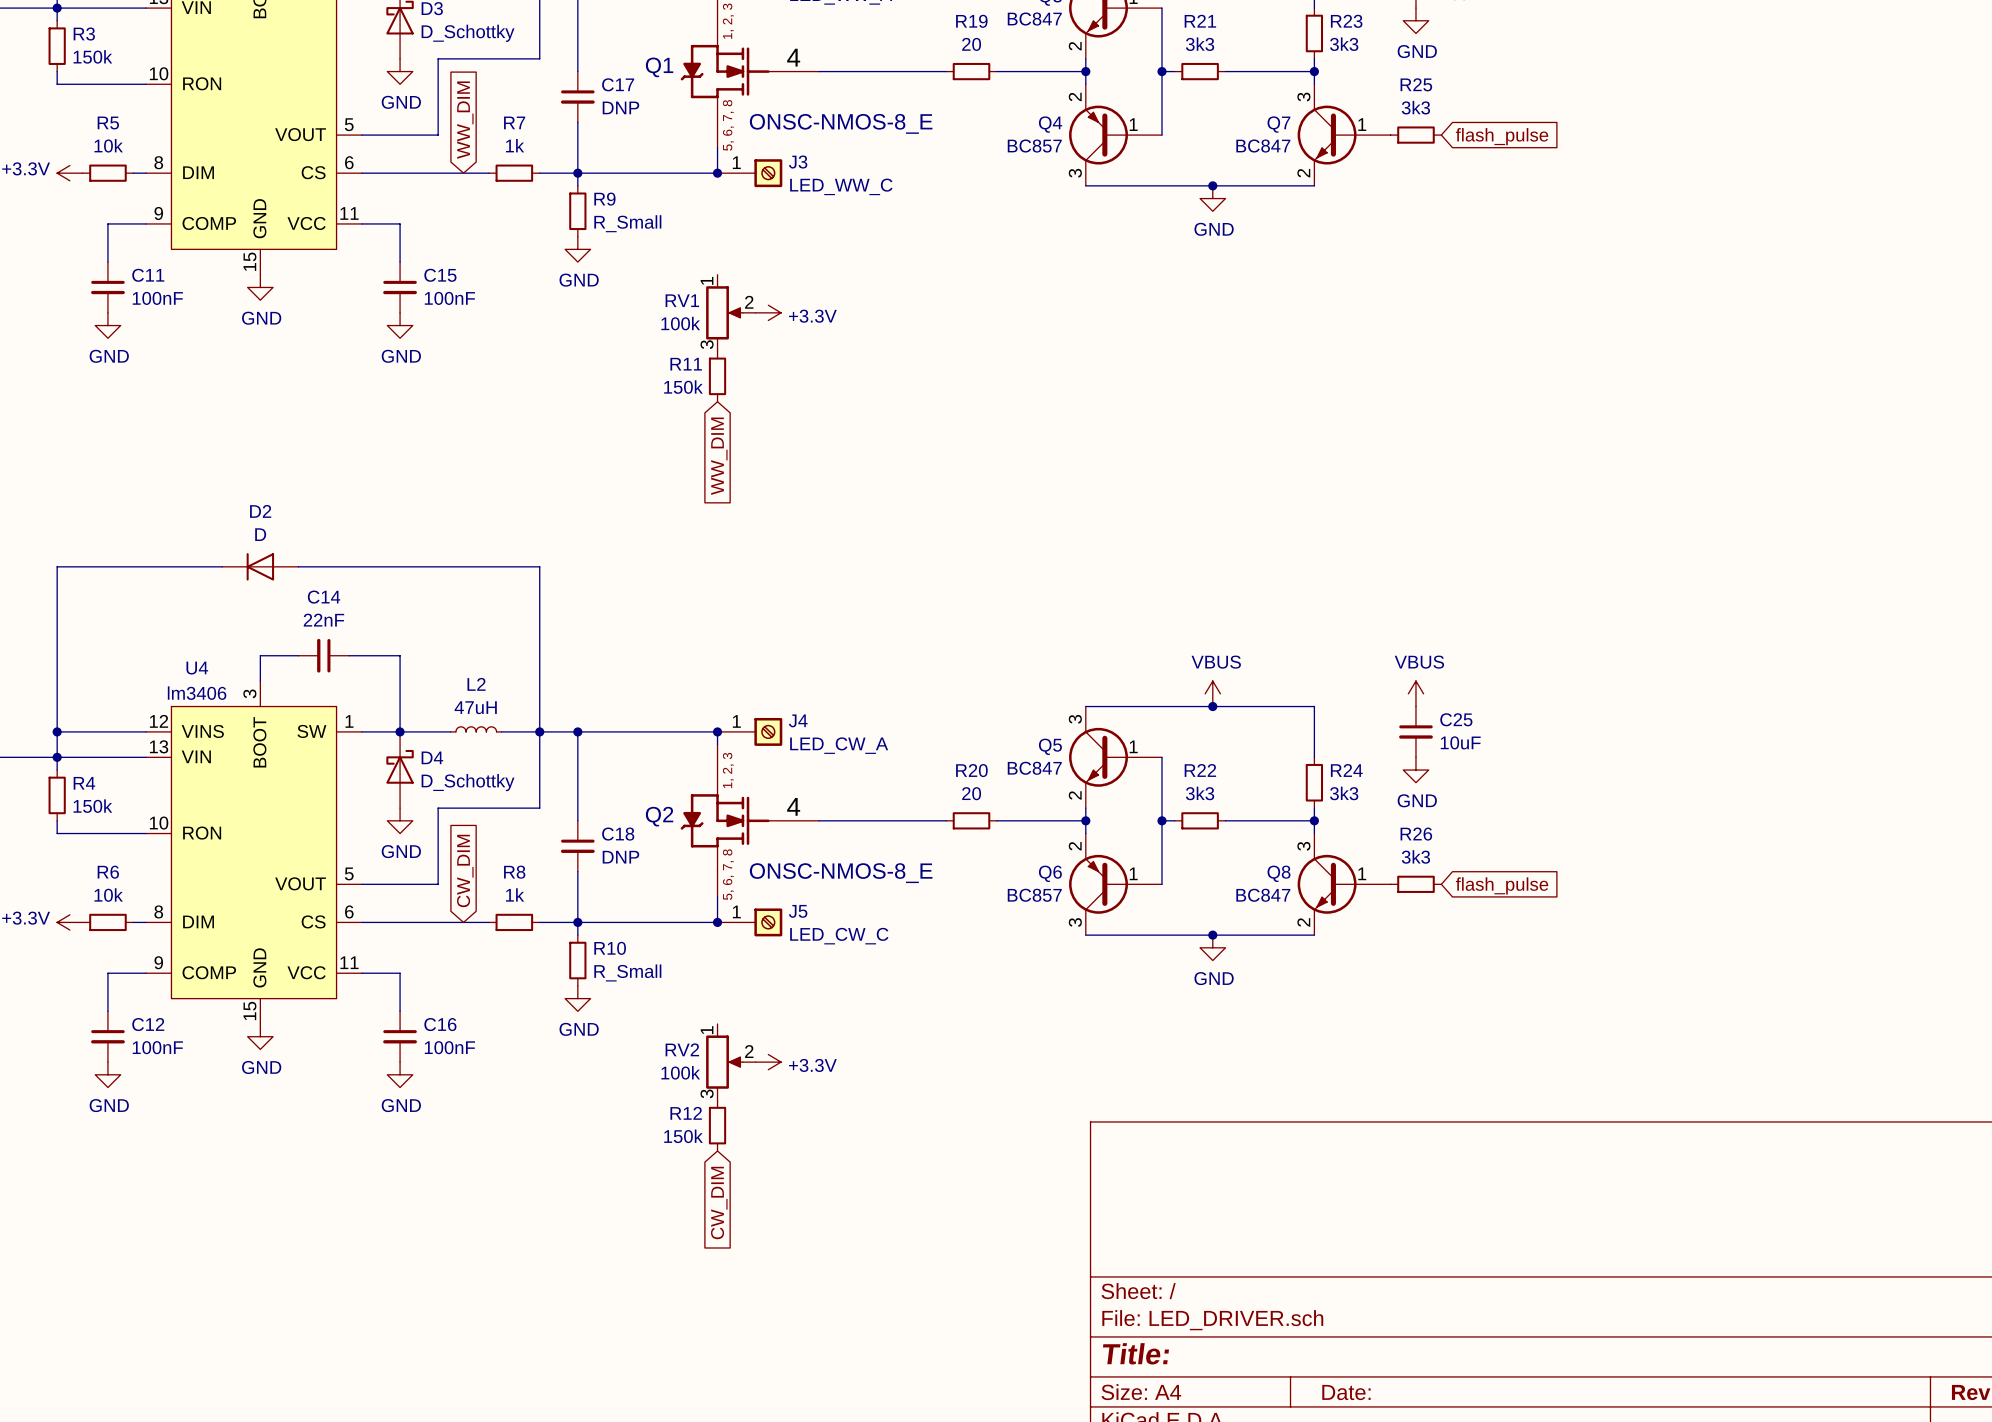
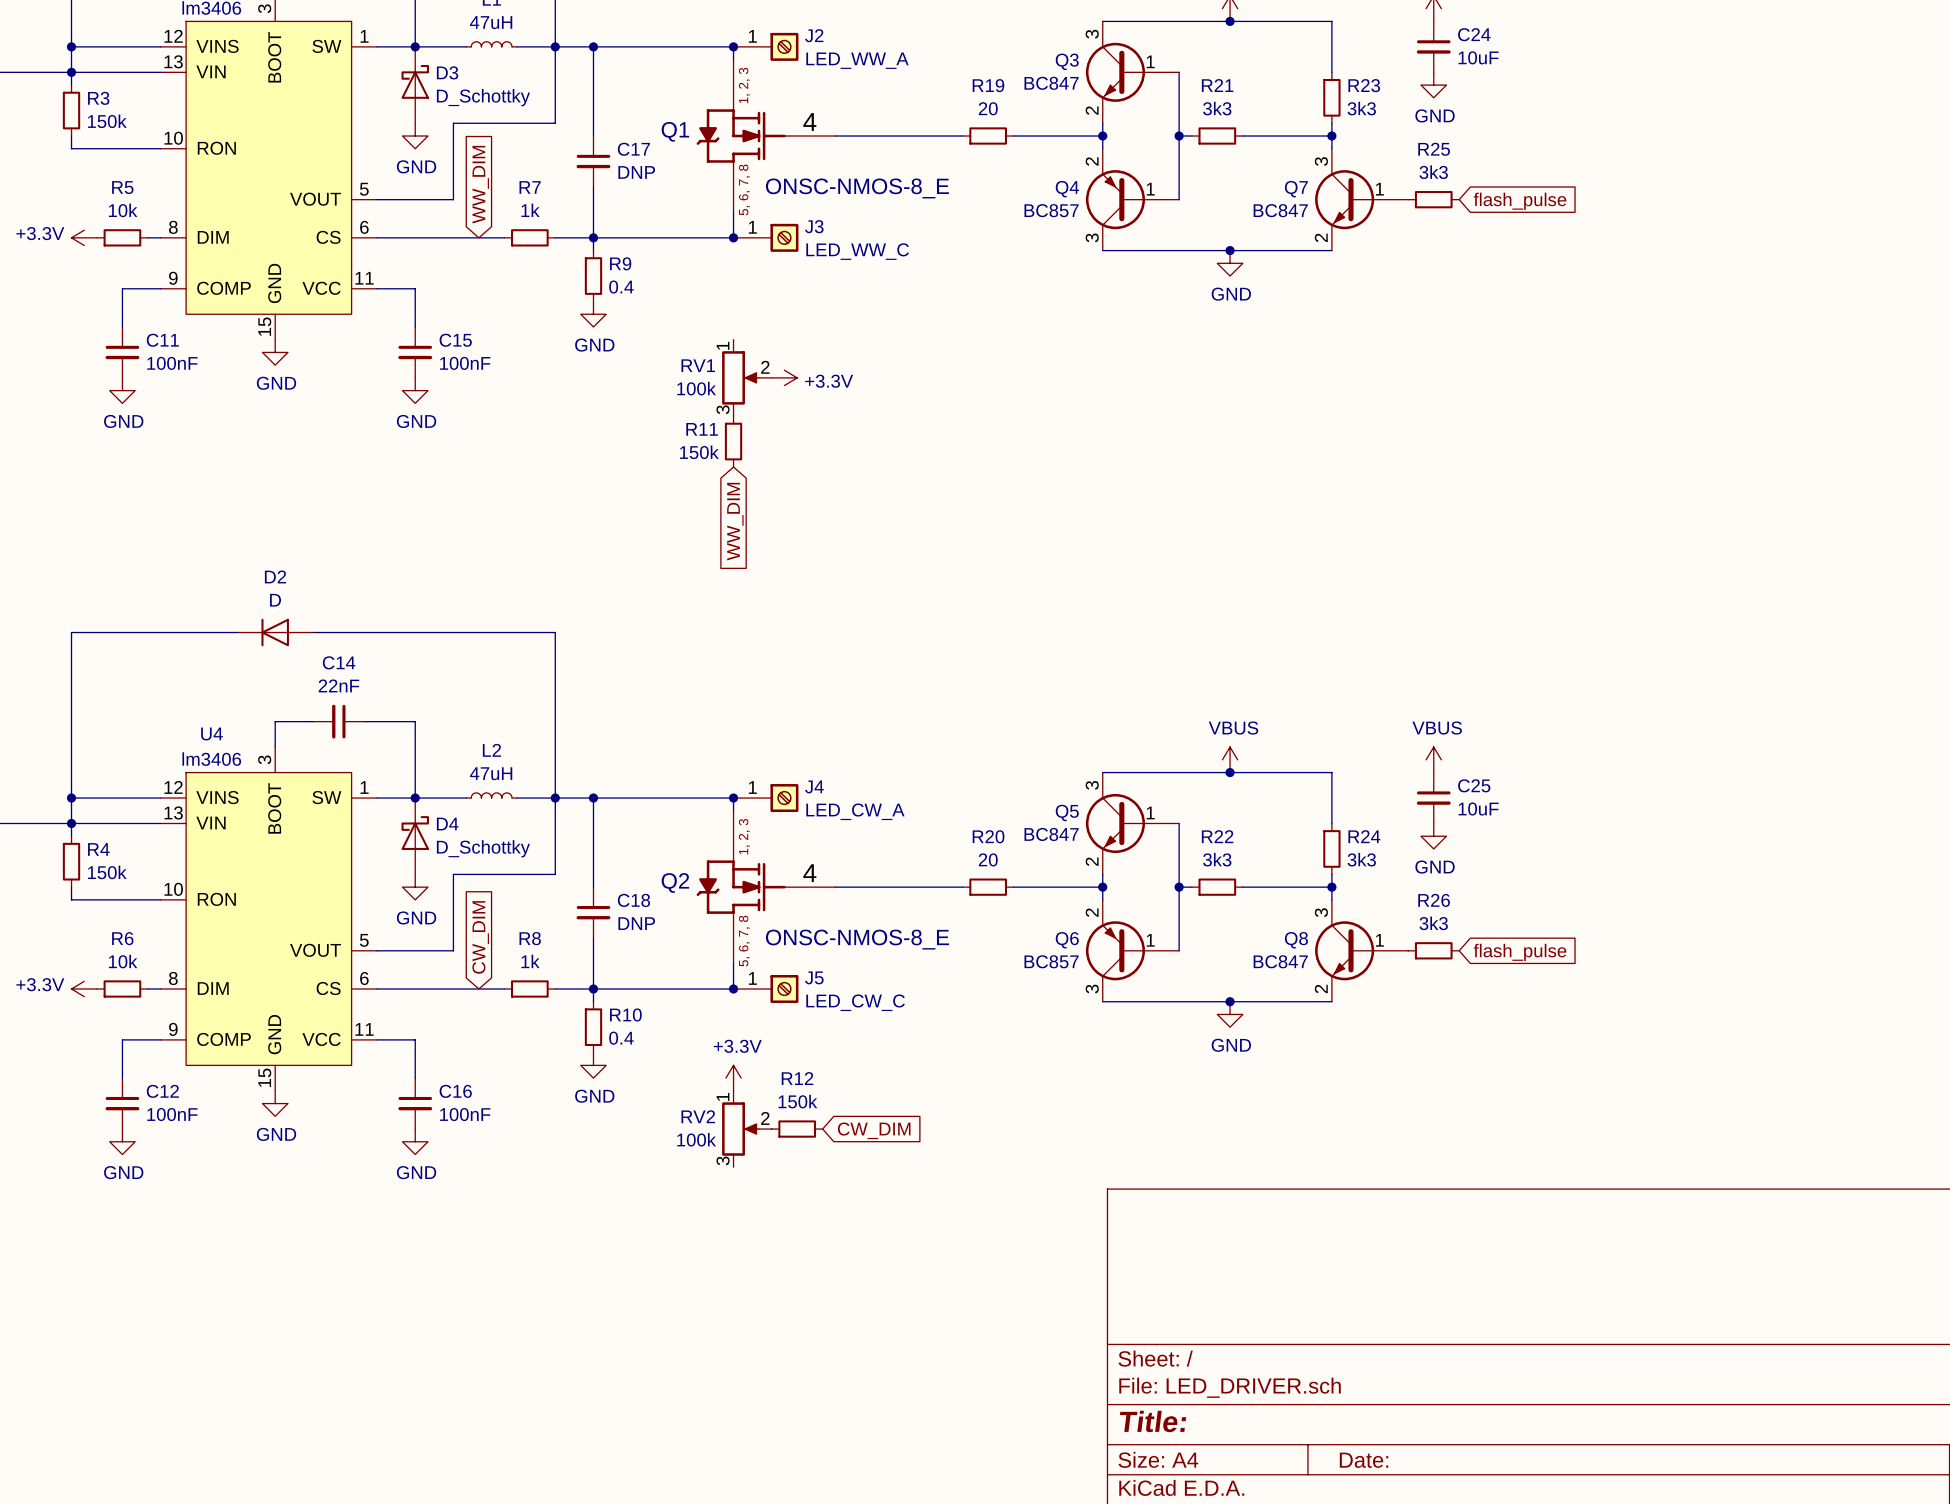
R9 value: R_Small (627, 223) -> 0.4 (621, 287)
R10 value: R_Small (627, 972) -> 0.4 (621, 1038)
power symbol rotation: 0° (768, 1062) -> 90° counterclockwise (733, 1078)
power symbol position: +3.3V (768, 1062) -> +3.3V (733, 1078)
power symbol text position: +3.3V (812, 1065) -> +3.3V (737, 1046)
R12 rotation: 0° (717, 1125) -> 90° clockwise (797, 1129)
R12 position: (717, 1125) -> (797, 1129)
global label rotation: 0° (719, 1203) -> 90° counterclockwise (874, 1130)
global label position: CW_DIM (719, 1203) -> CW_DIM (874, 1130)

